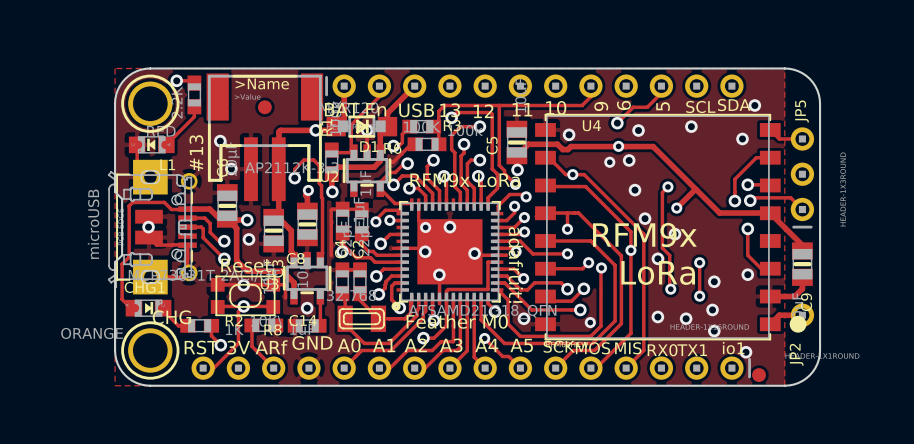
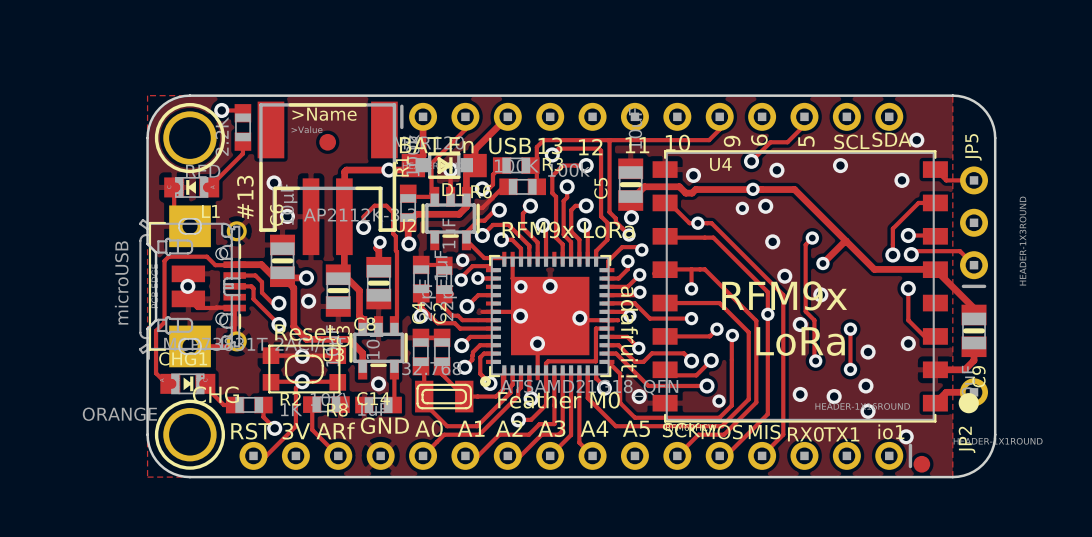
via: none -> (462, 260)
track: (342, 209) (331, 210) (331, 255) -> none
track: (273, 284) (283, 284) (285, 286) (285, 297) -> none
track: (484, 338) (502, 356) (508, 356) (520, 368) -> none
via: (484, 338) -> none

